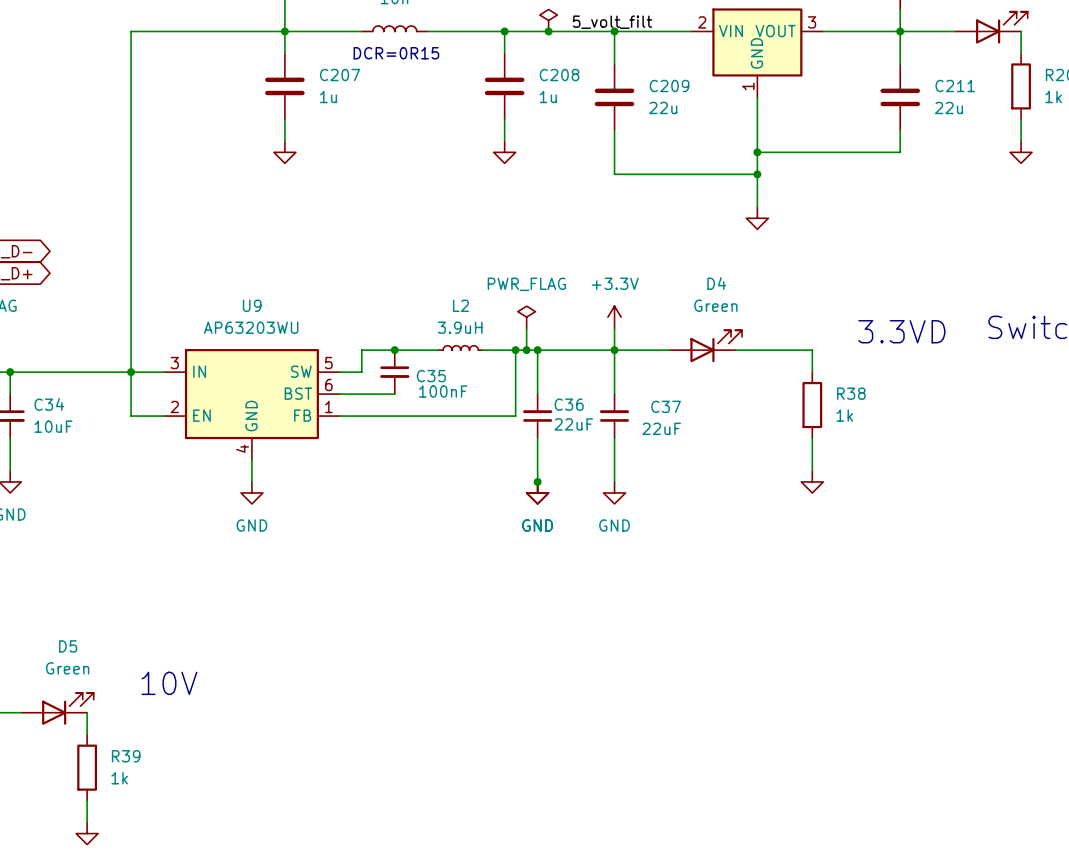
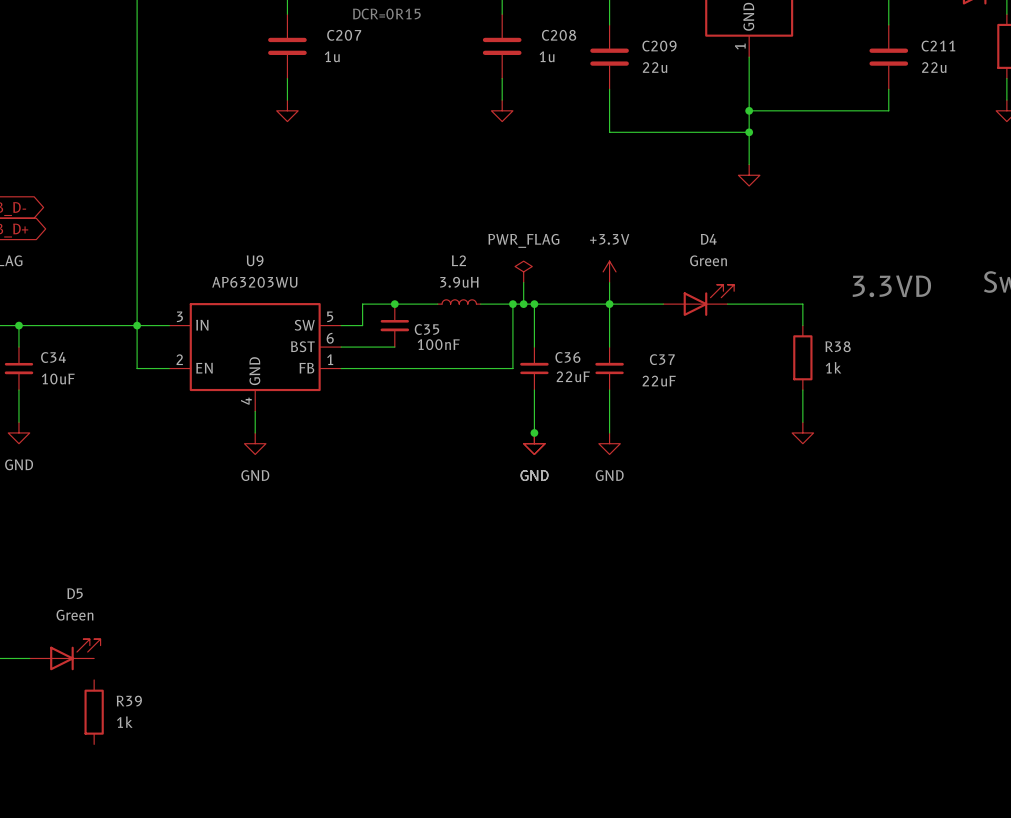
text: 10V (169, 683) -> none
wire: (87, 712) (87, 734) -> none
wire: (87, 800) (87, 822) -> none
power symbol: (87, 833) -> none

